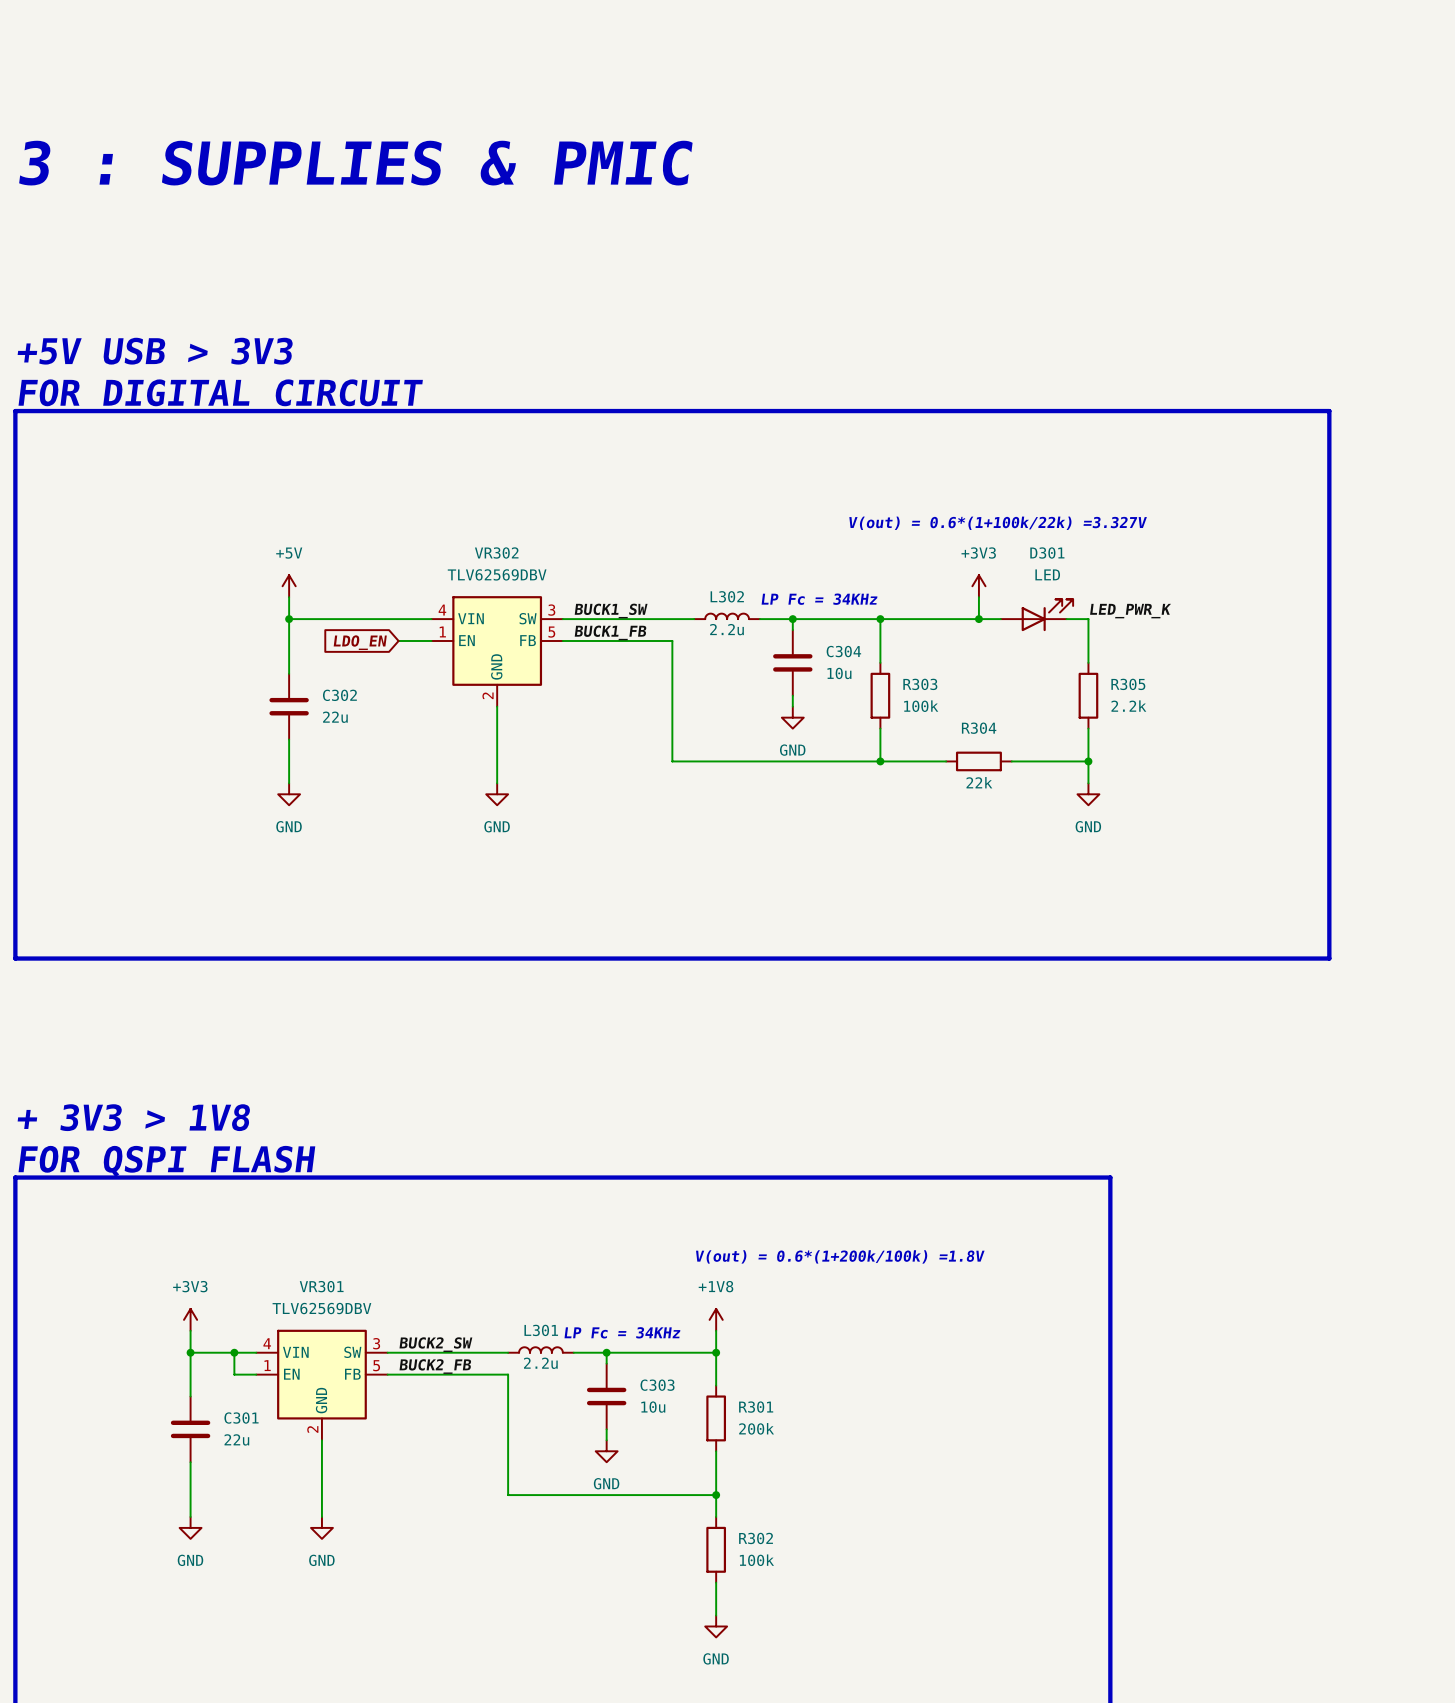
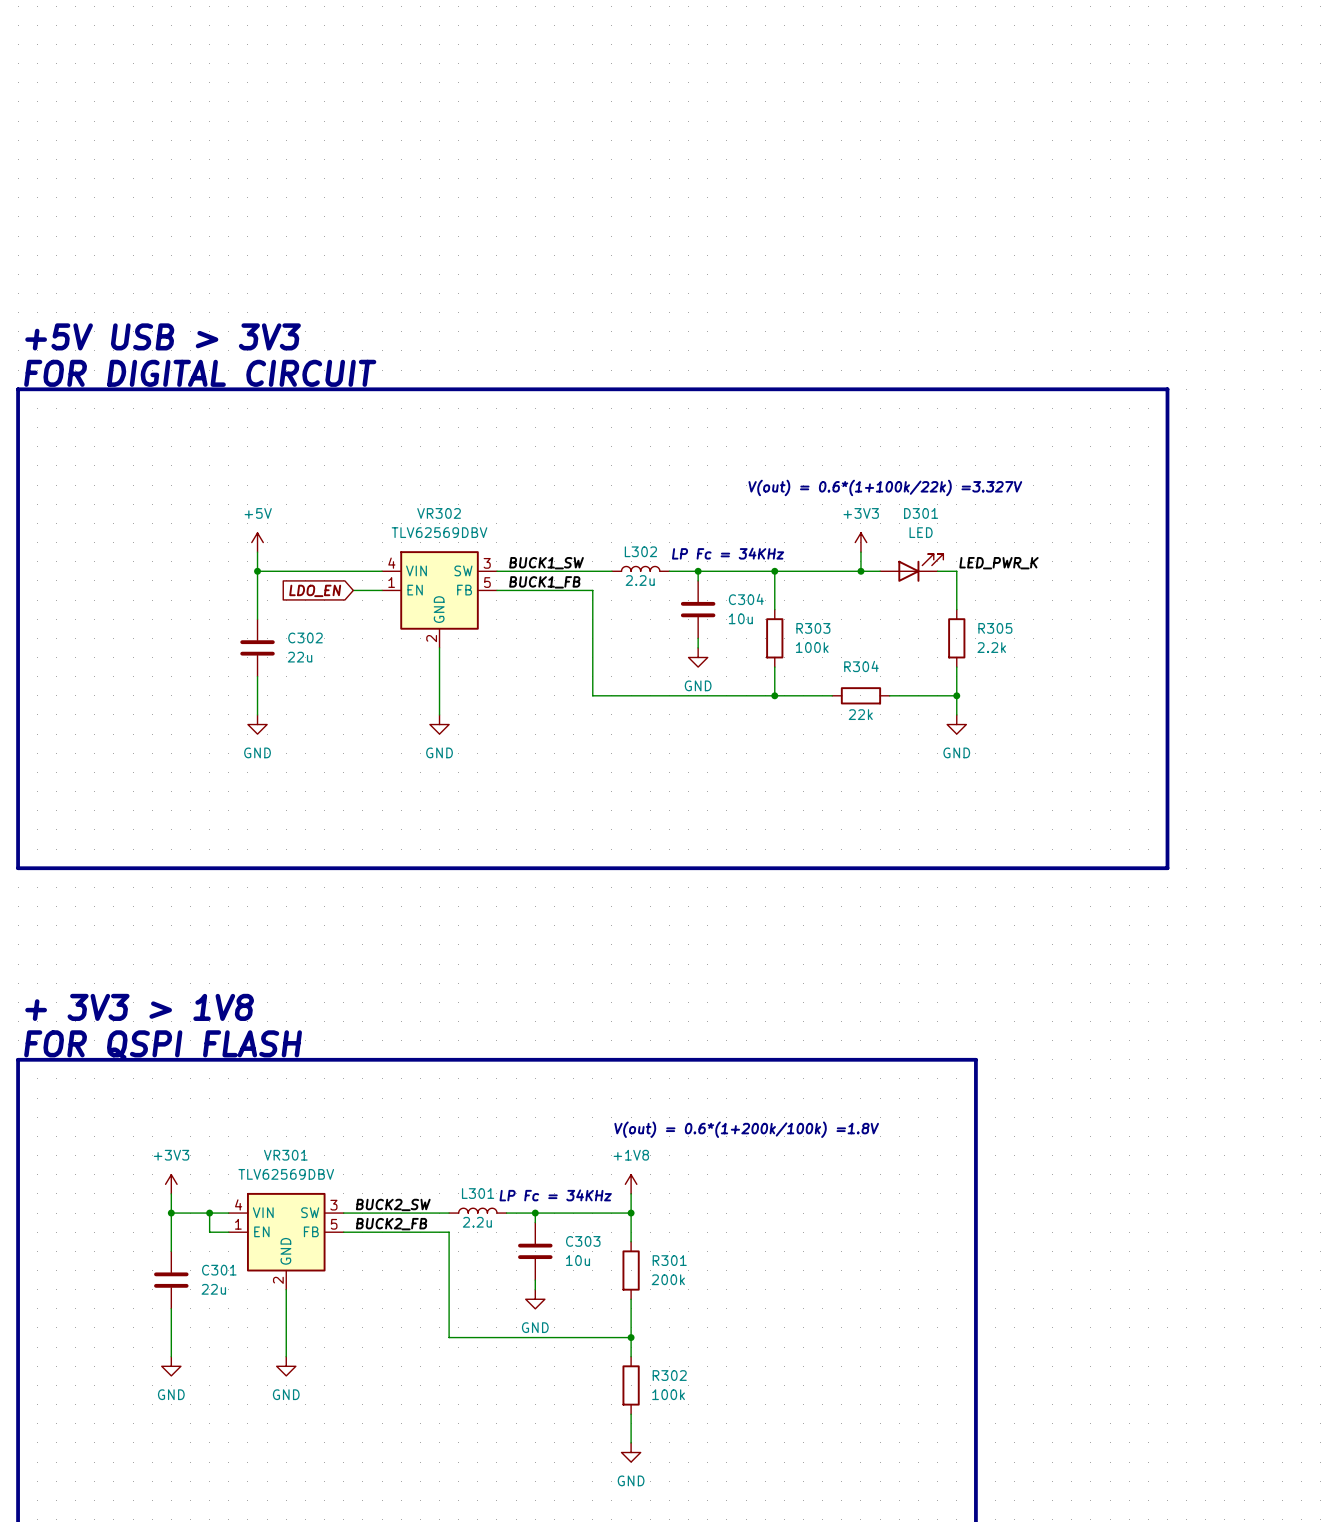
text: 3 : SUPPLIES & PMIC (355, 163) -> none

